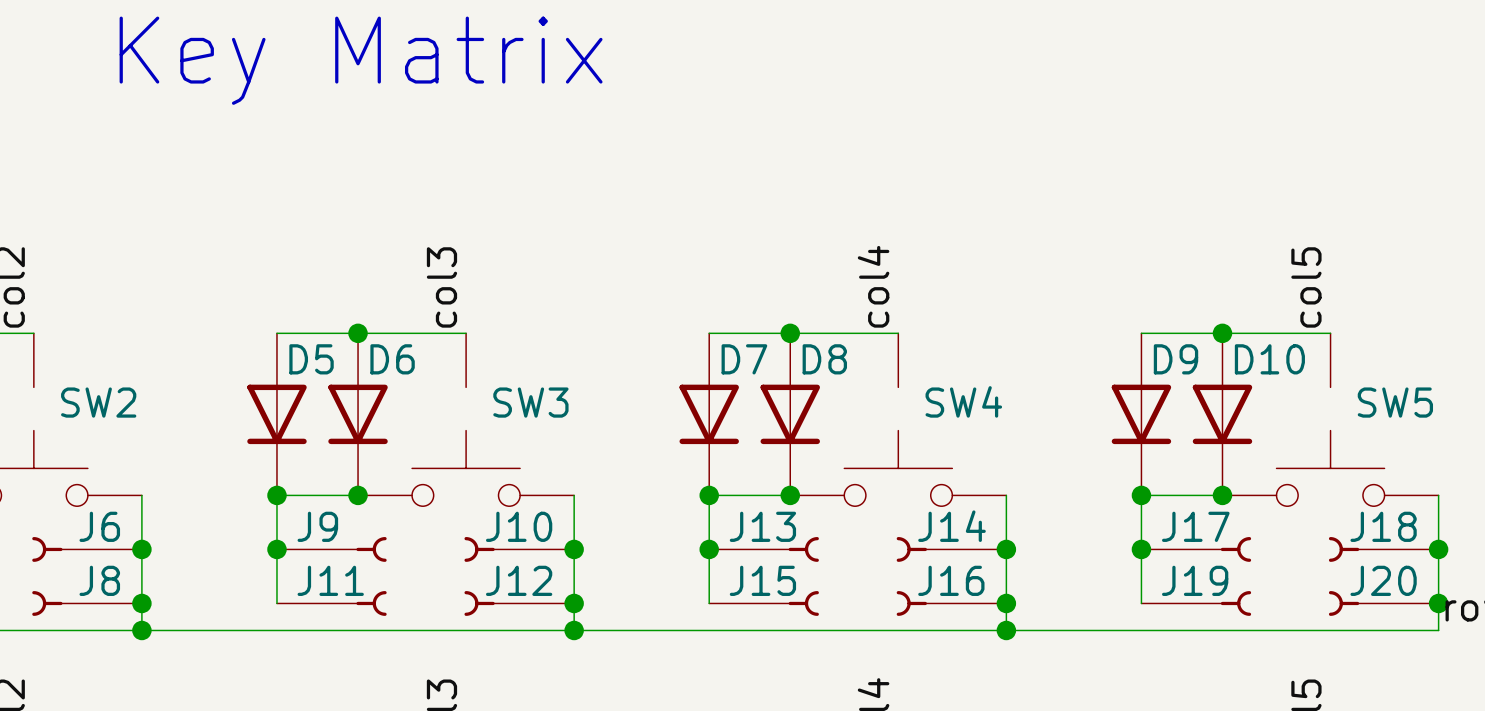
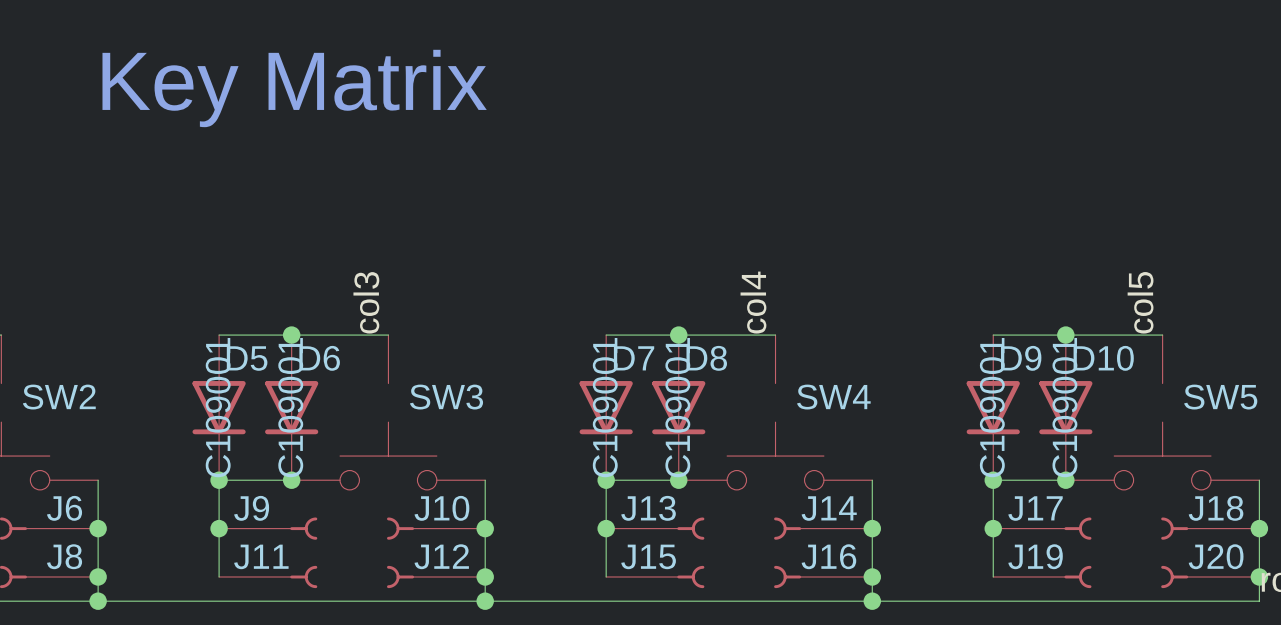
D5 text: none -> C109001 (218, 407)
D6 text: none -> C109001 (290, 407)
D7 text: none -> C109001 (605, 407)
D8 text: none -> C109001 (677, 407)
D9 text: none -> C109001 (992, 407)
D10 text: none -> C109001 (1064, 407)

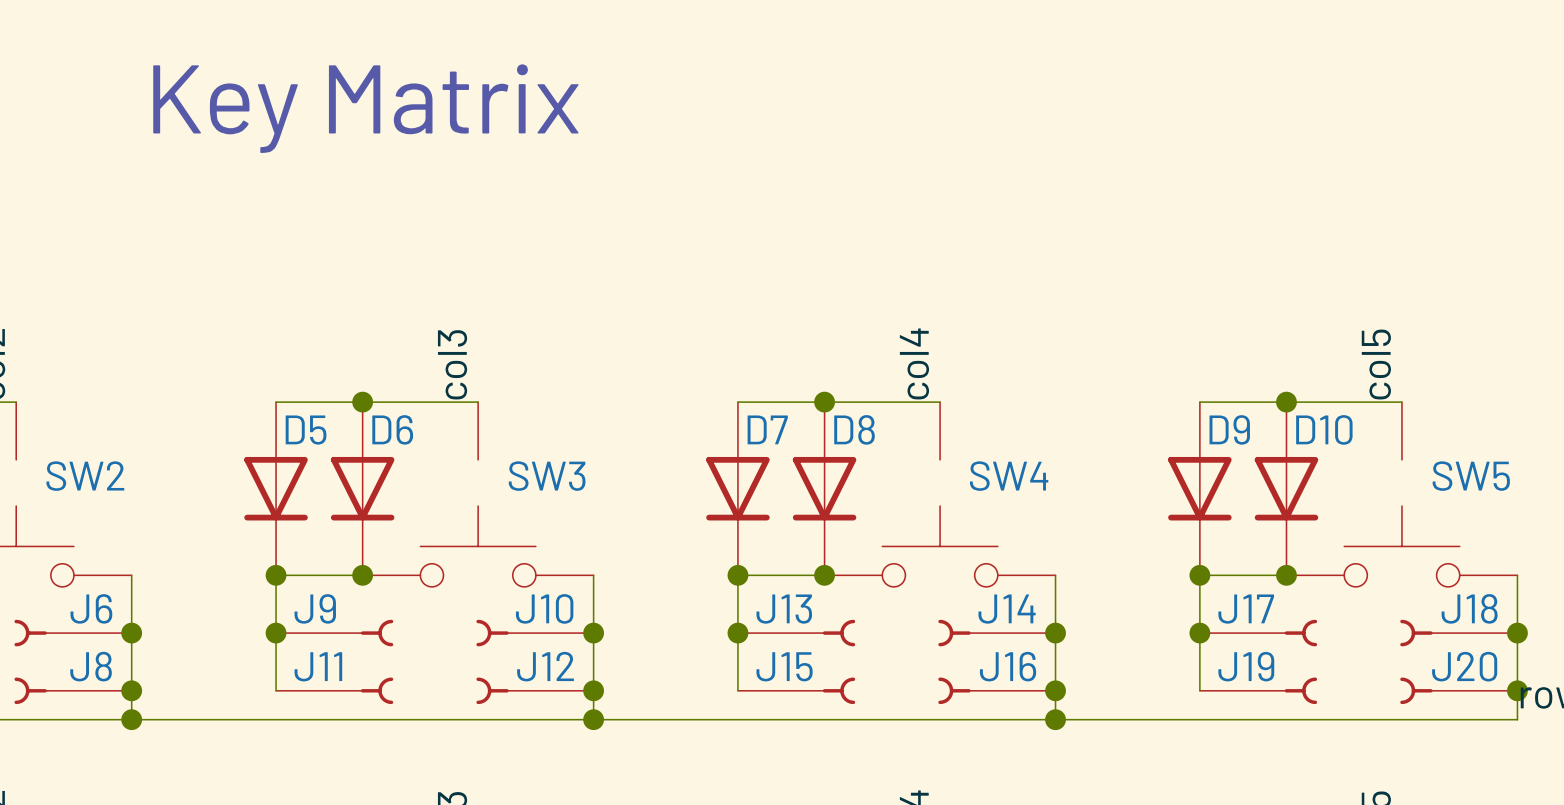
D5 text: C109001 (218, 407) -> none
D6 text: C109001 (290, 407) -> none
D7 text: C109001 (605, 407) -> none
D8 text: C109001 (677, 407) -> none
D9 text: C109001 (992, 407) -> none
D10 text: C109001 (1064, 407) -> none

